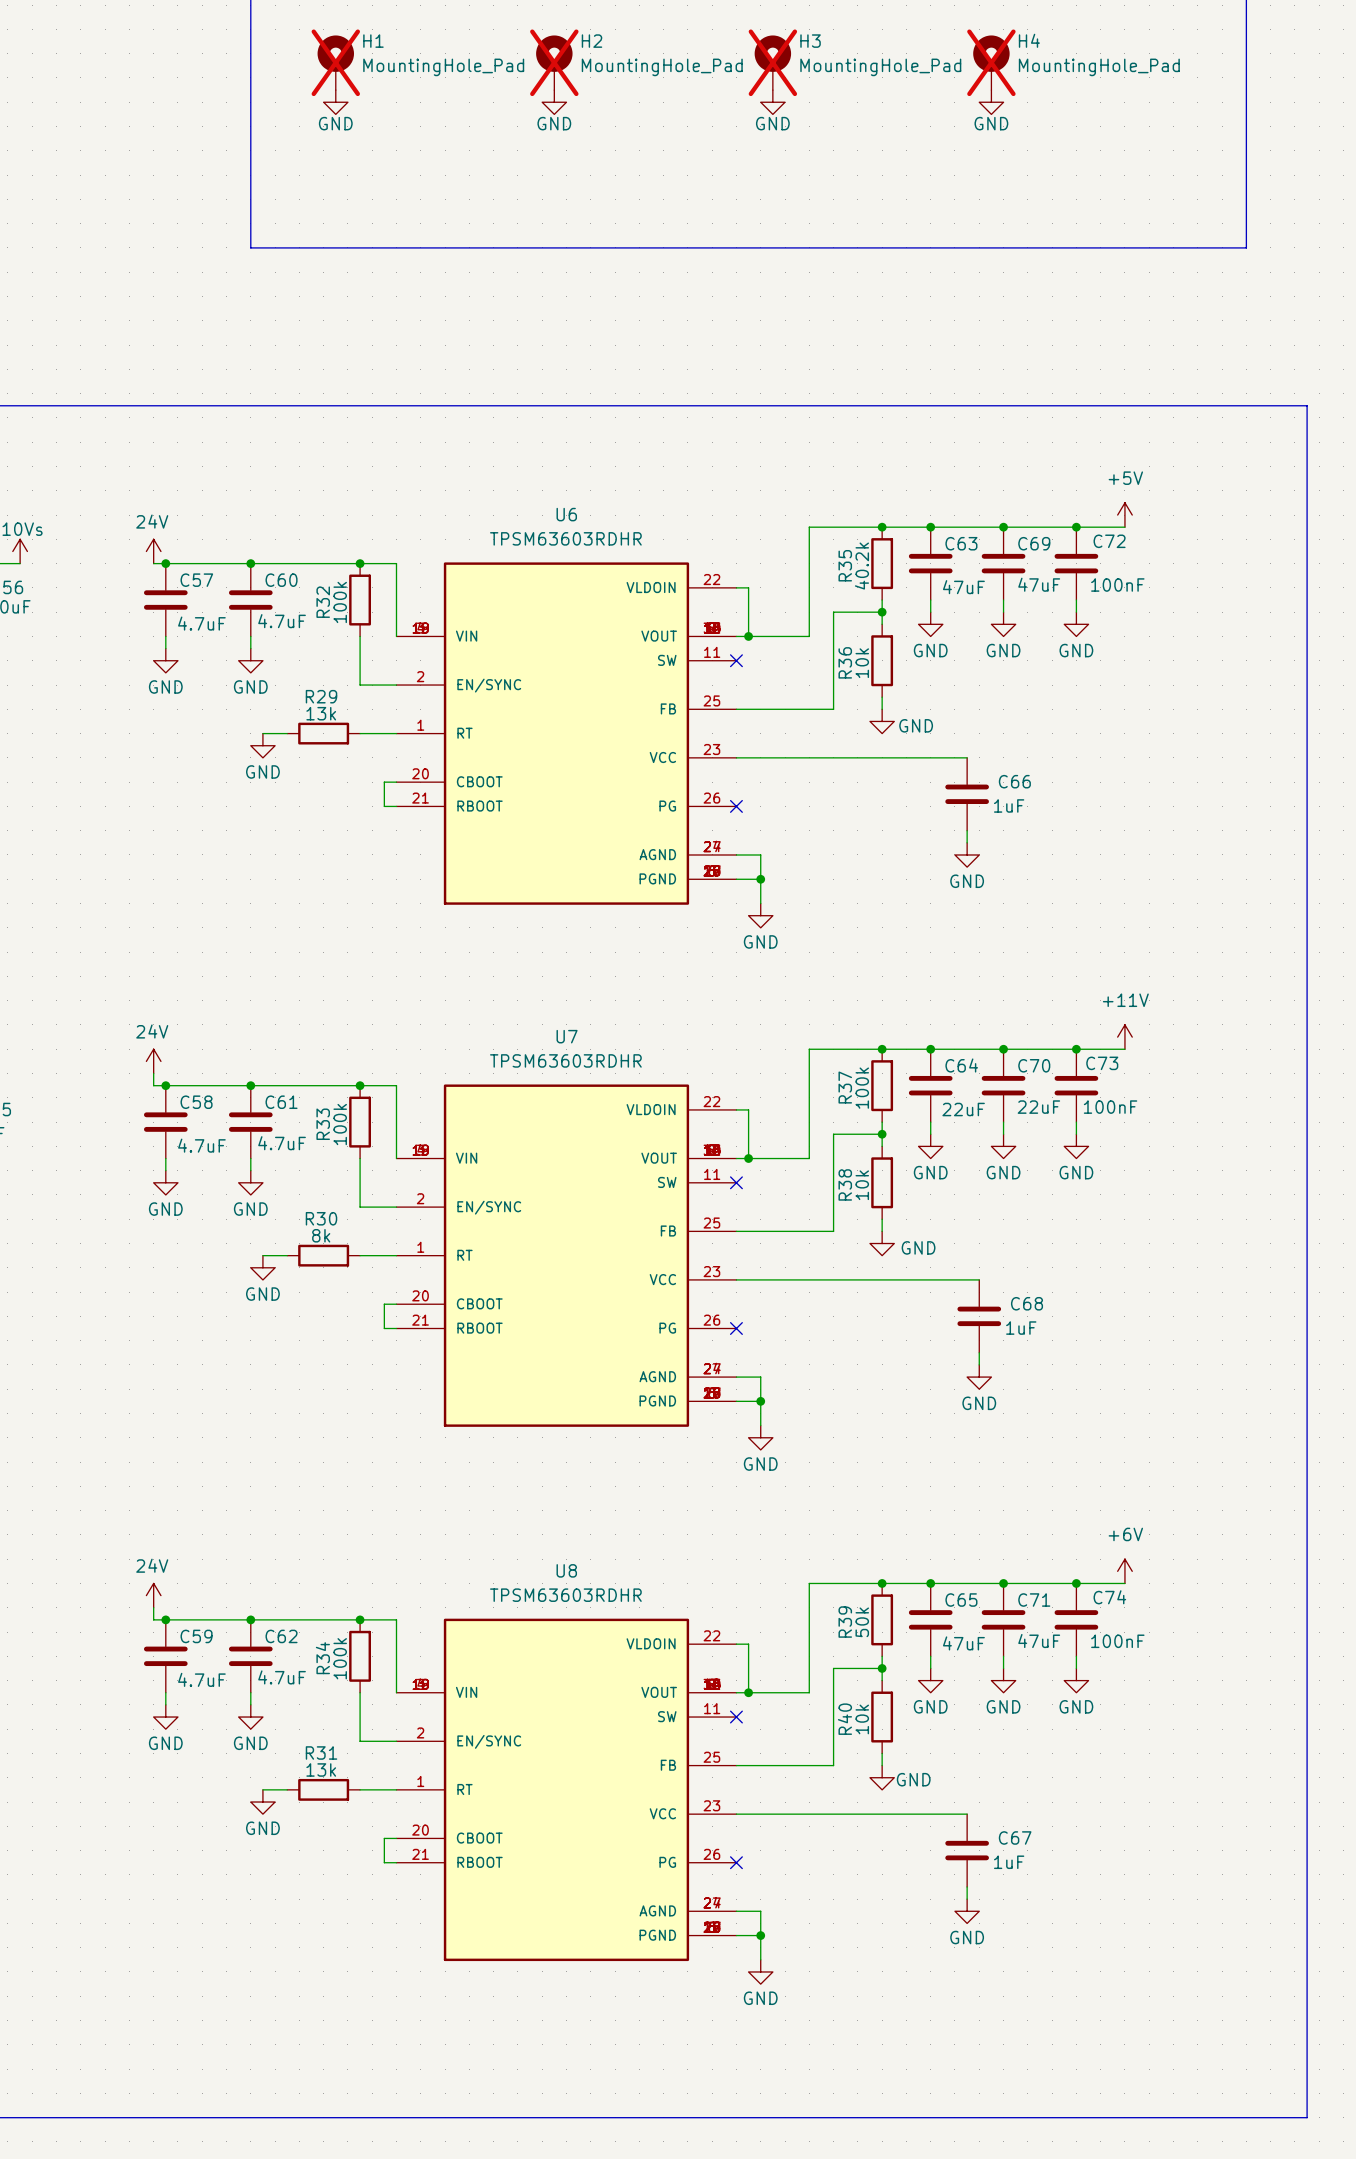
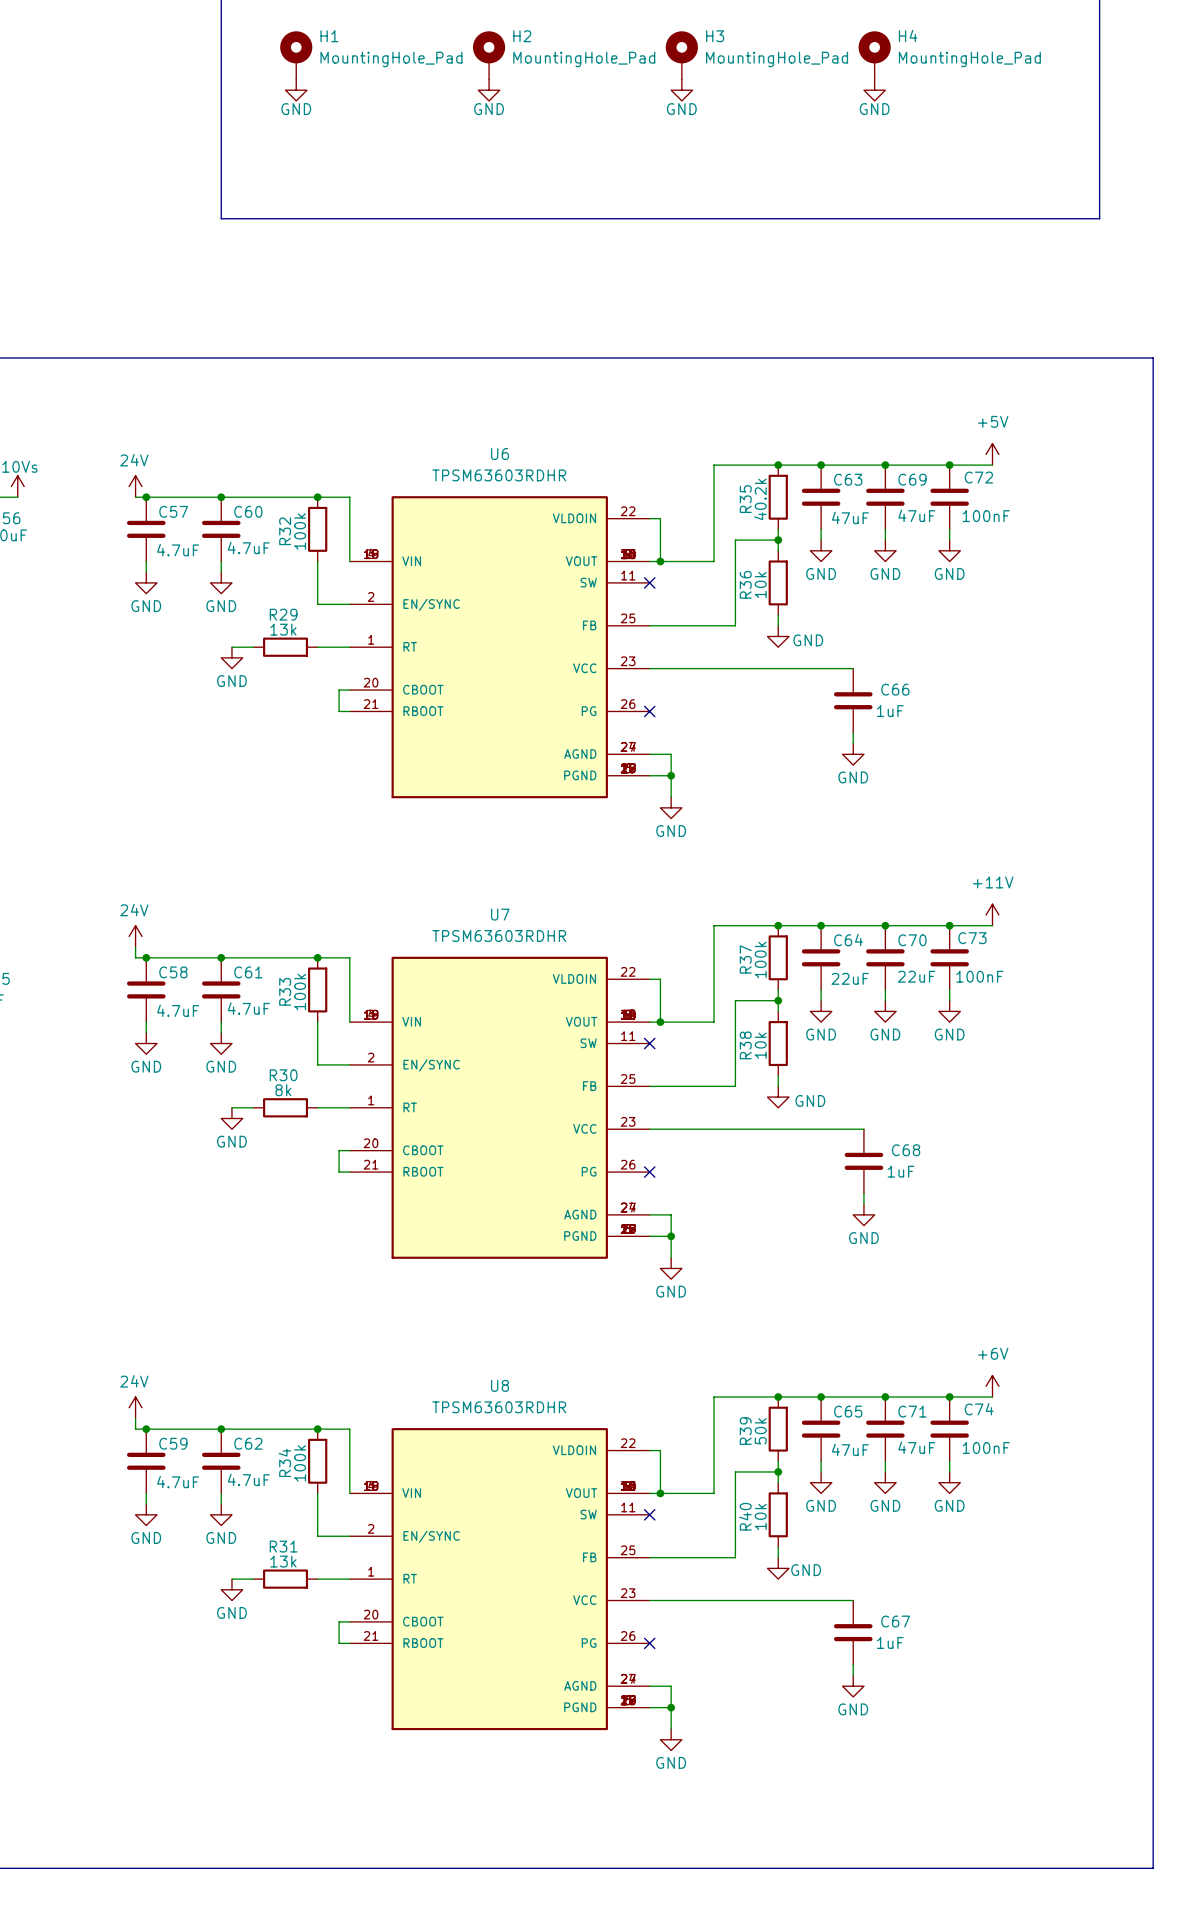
H1 do-not-place cross: (335, 62) -> none
H2 do-not-place cross: (554, 62) -> none
H3 do-not-place cross: (772, 62) -> none
H4 do-not-place cross: (991, 62) -> none

